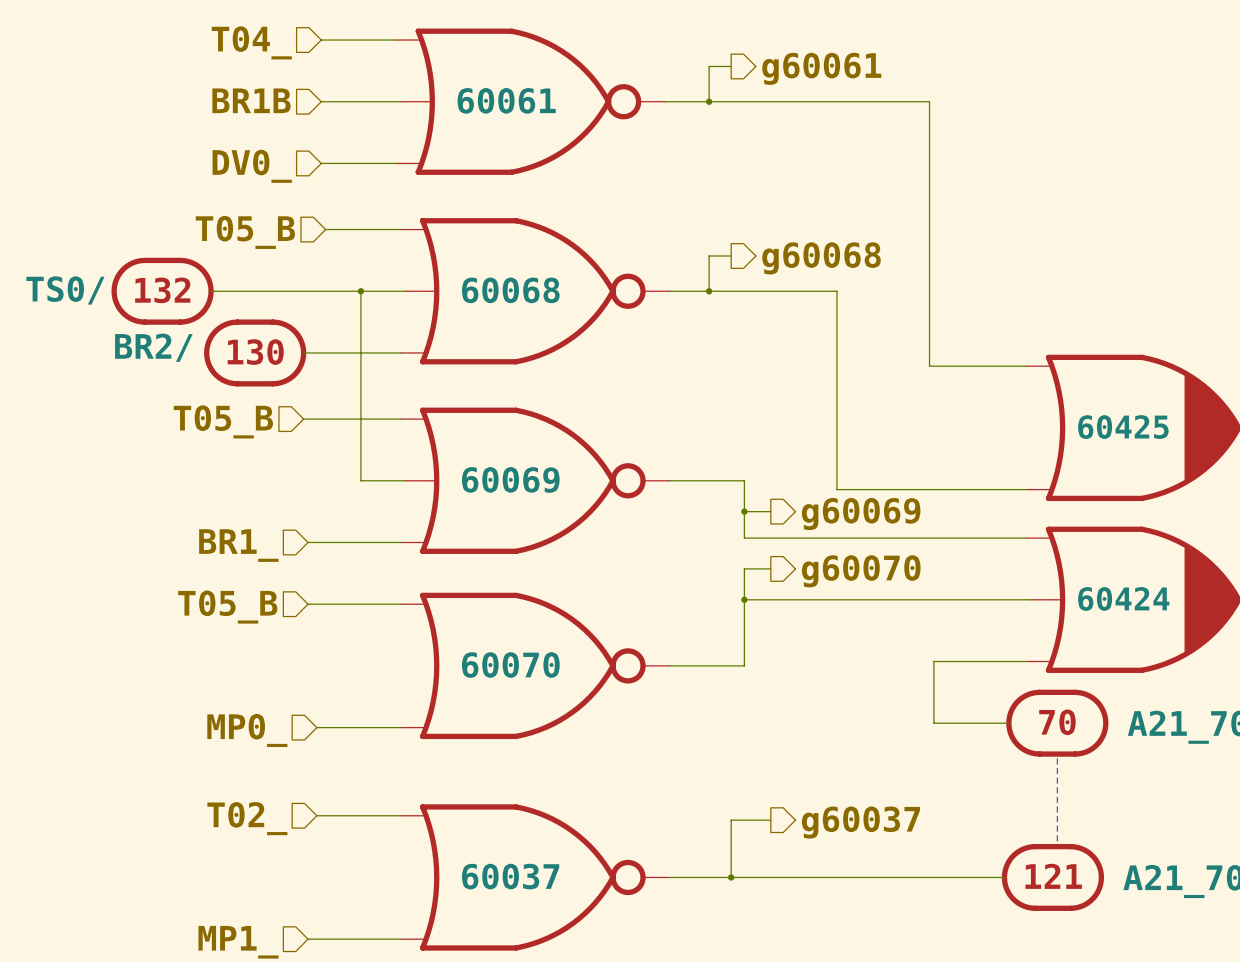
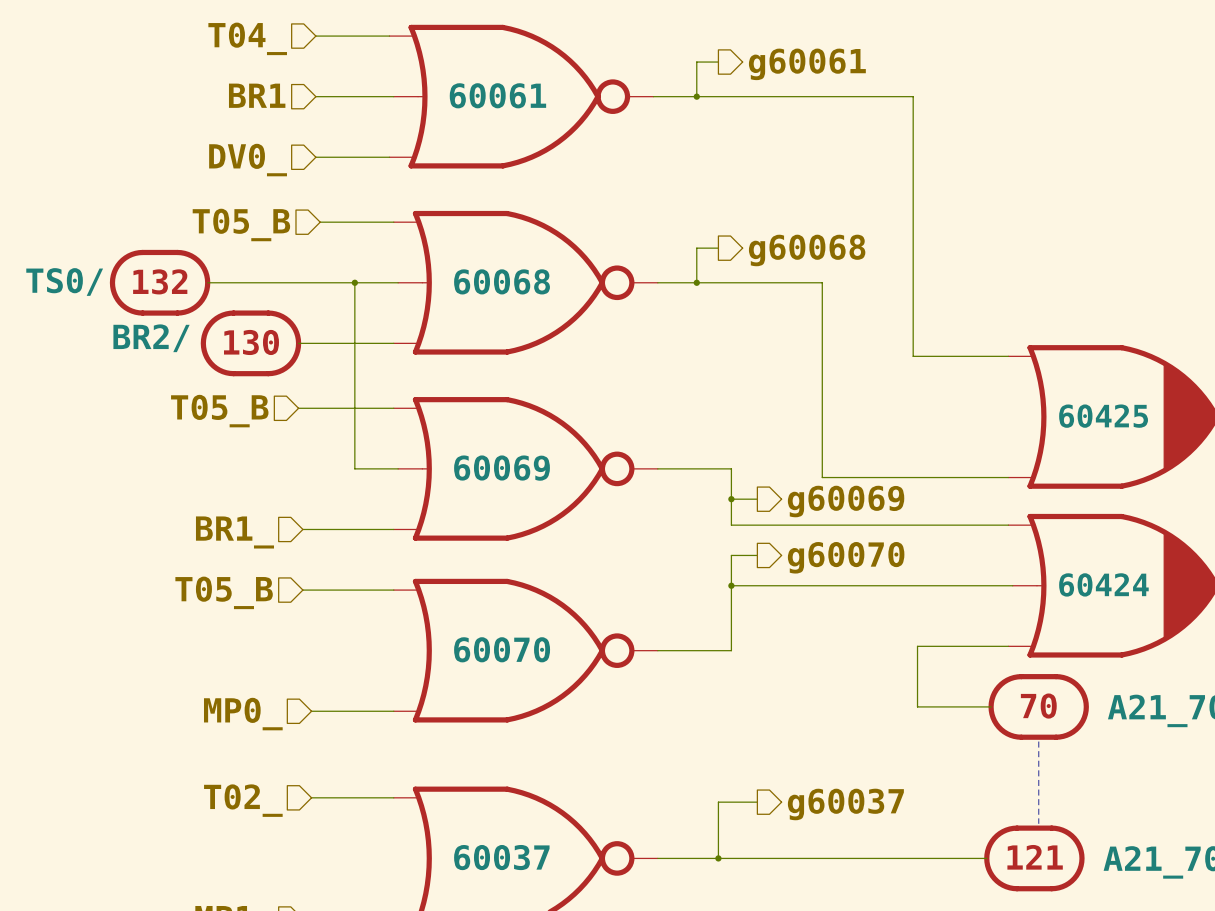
hierarchical label: BR1B (251, 100) -> BR1 (257, 95)

